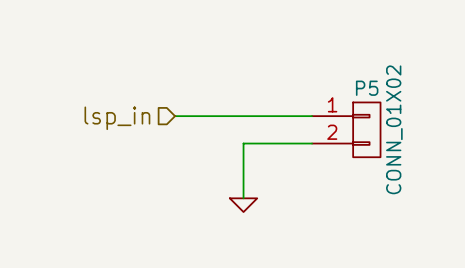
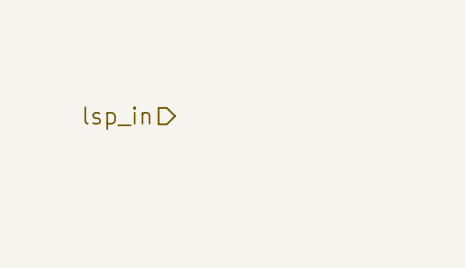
wire: (175, 116) (312, 116) -> none
P5: CONN_01X02 (346, 129) -> none
wire: (312, 143) (243, 143) (243, 198) -> none
power symbol: (243, 205) -> none

